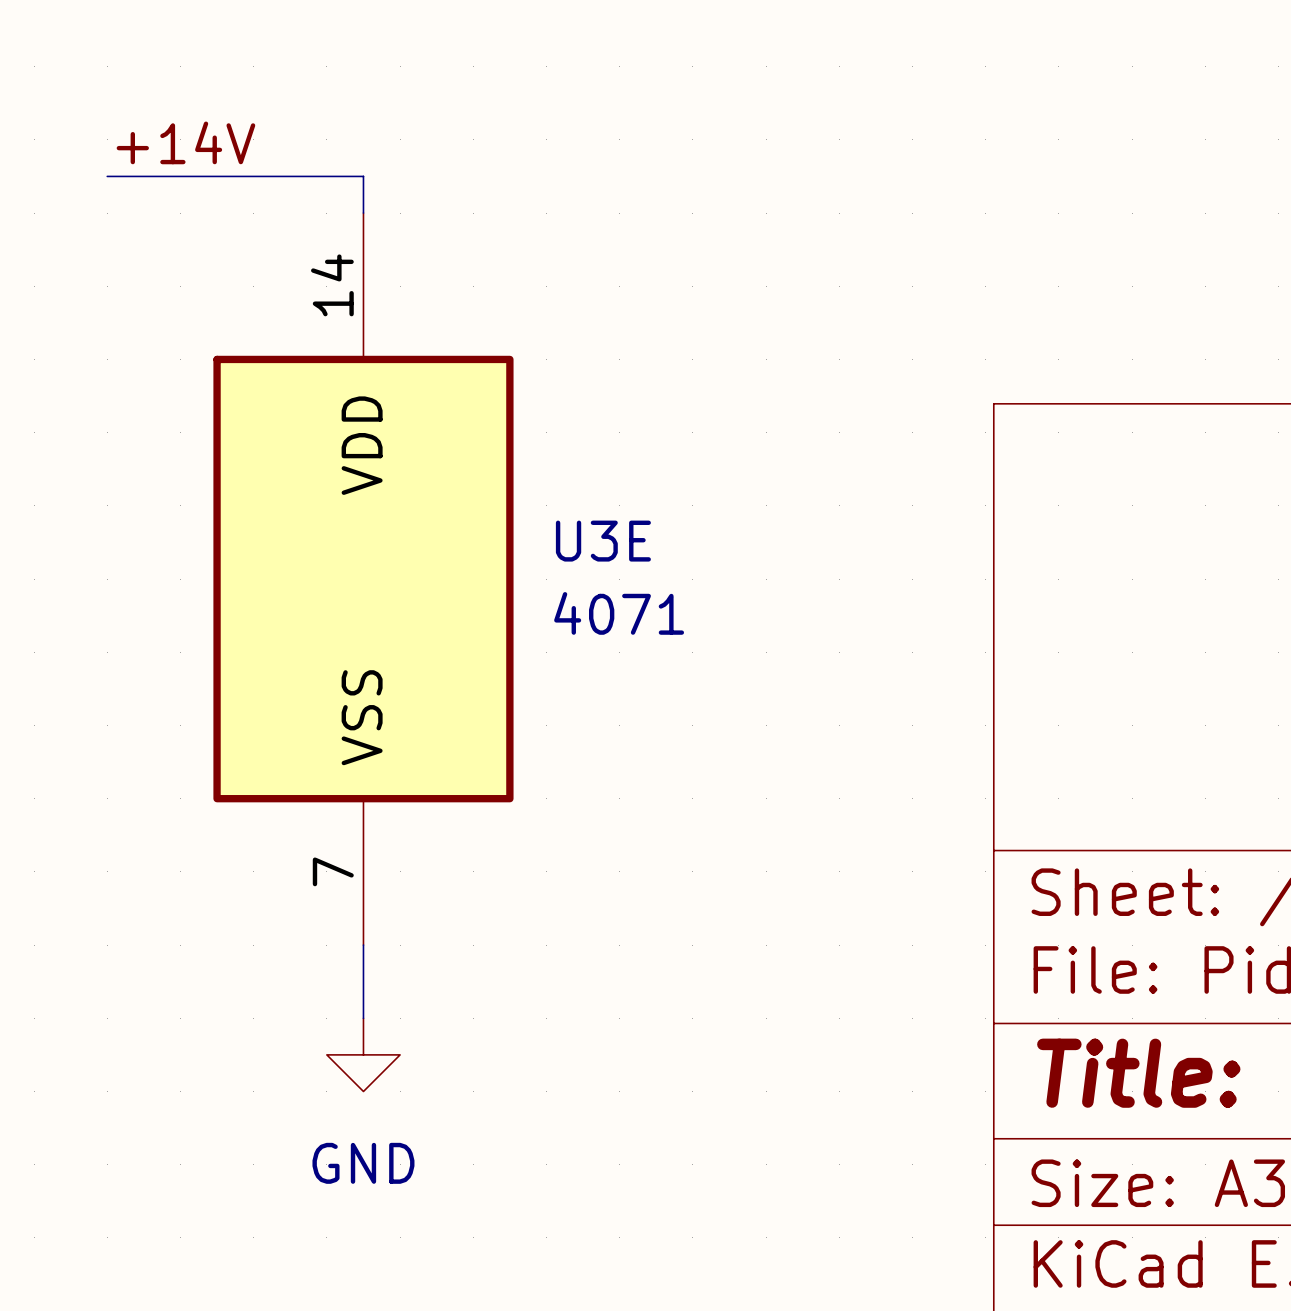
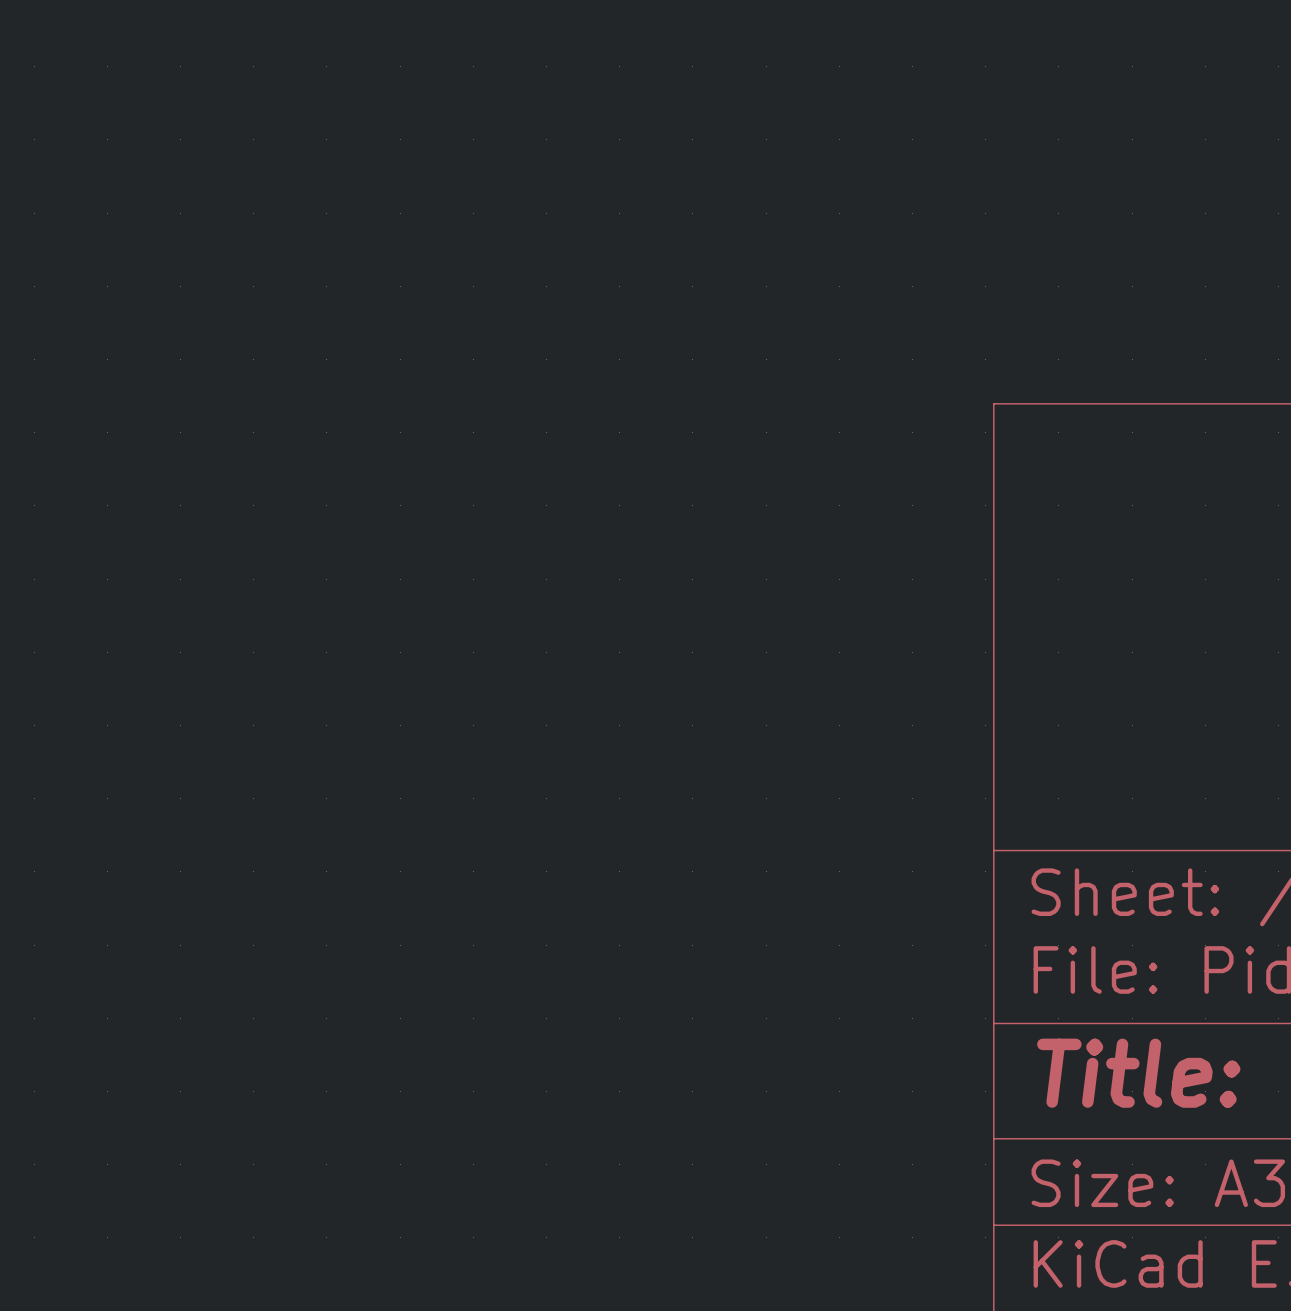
label: +14V (185, 142) -> none
wire: (107, 176) (363, 176) (363, 213) -> none
U3E: 4071 (363, 579) -> none
wire: (363, 945) (363, 1018) -> none
power symbol: GND (363, 1054) -> none

